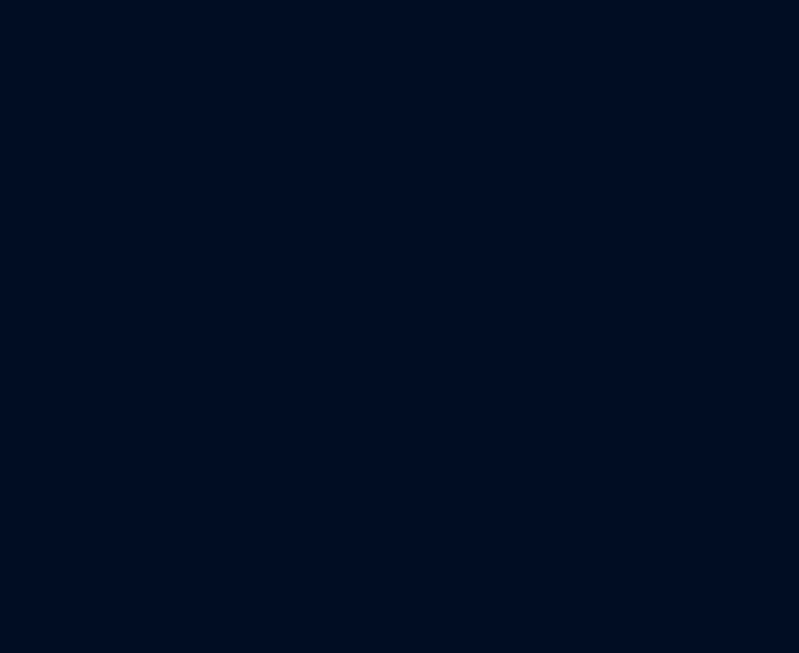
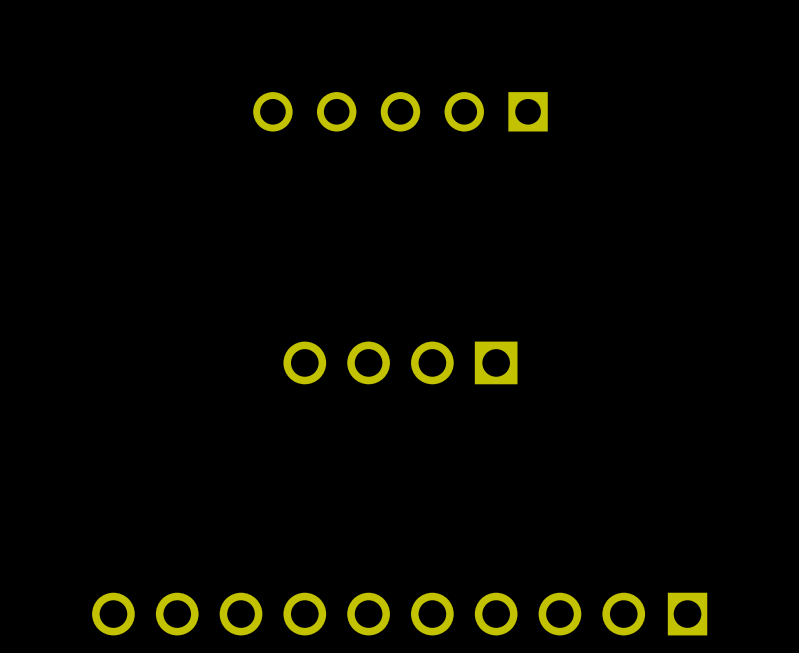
part: none -> (400, 111)
part: none -> (400, 362)
part: none -> (399, 614)

